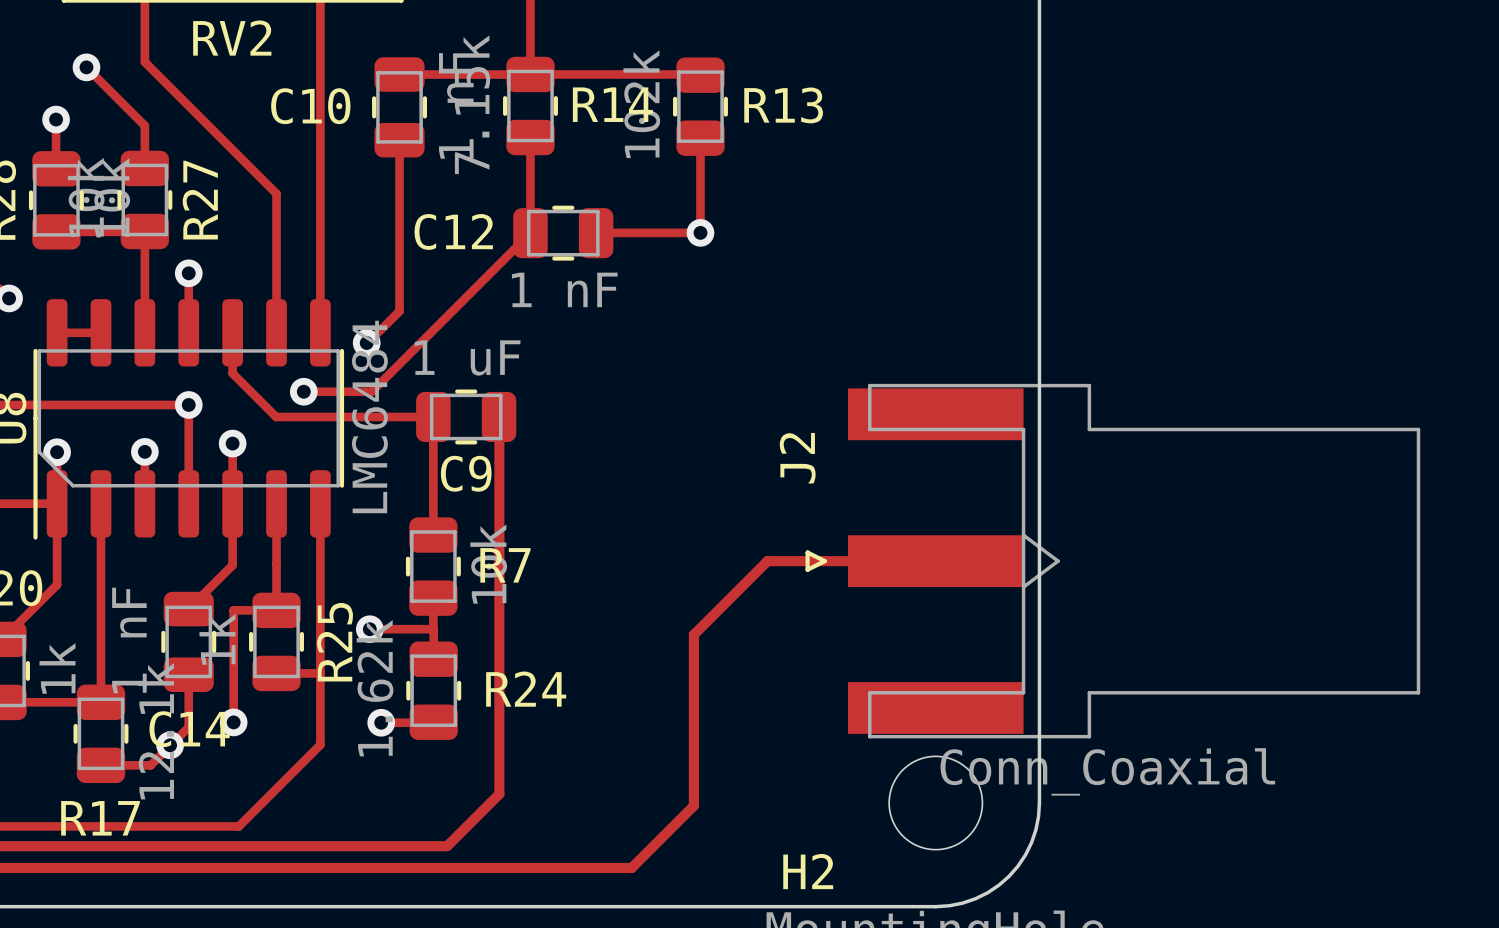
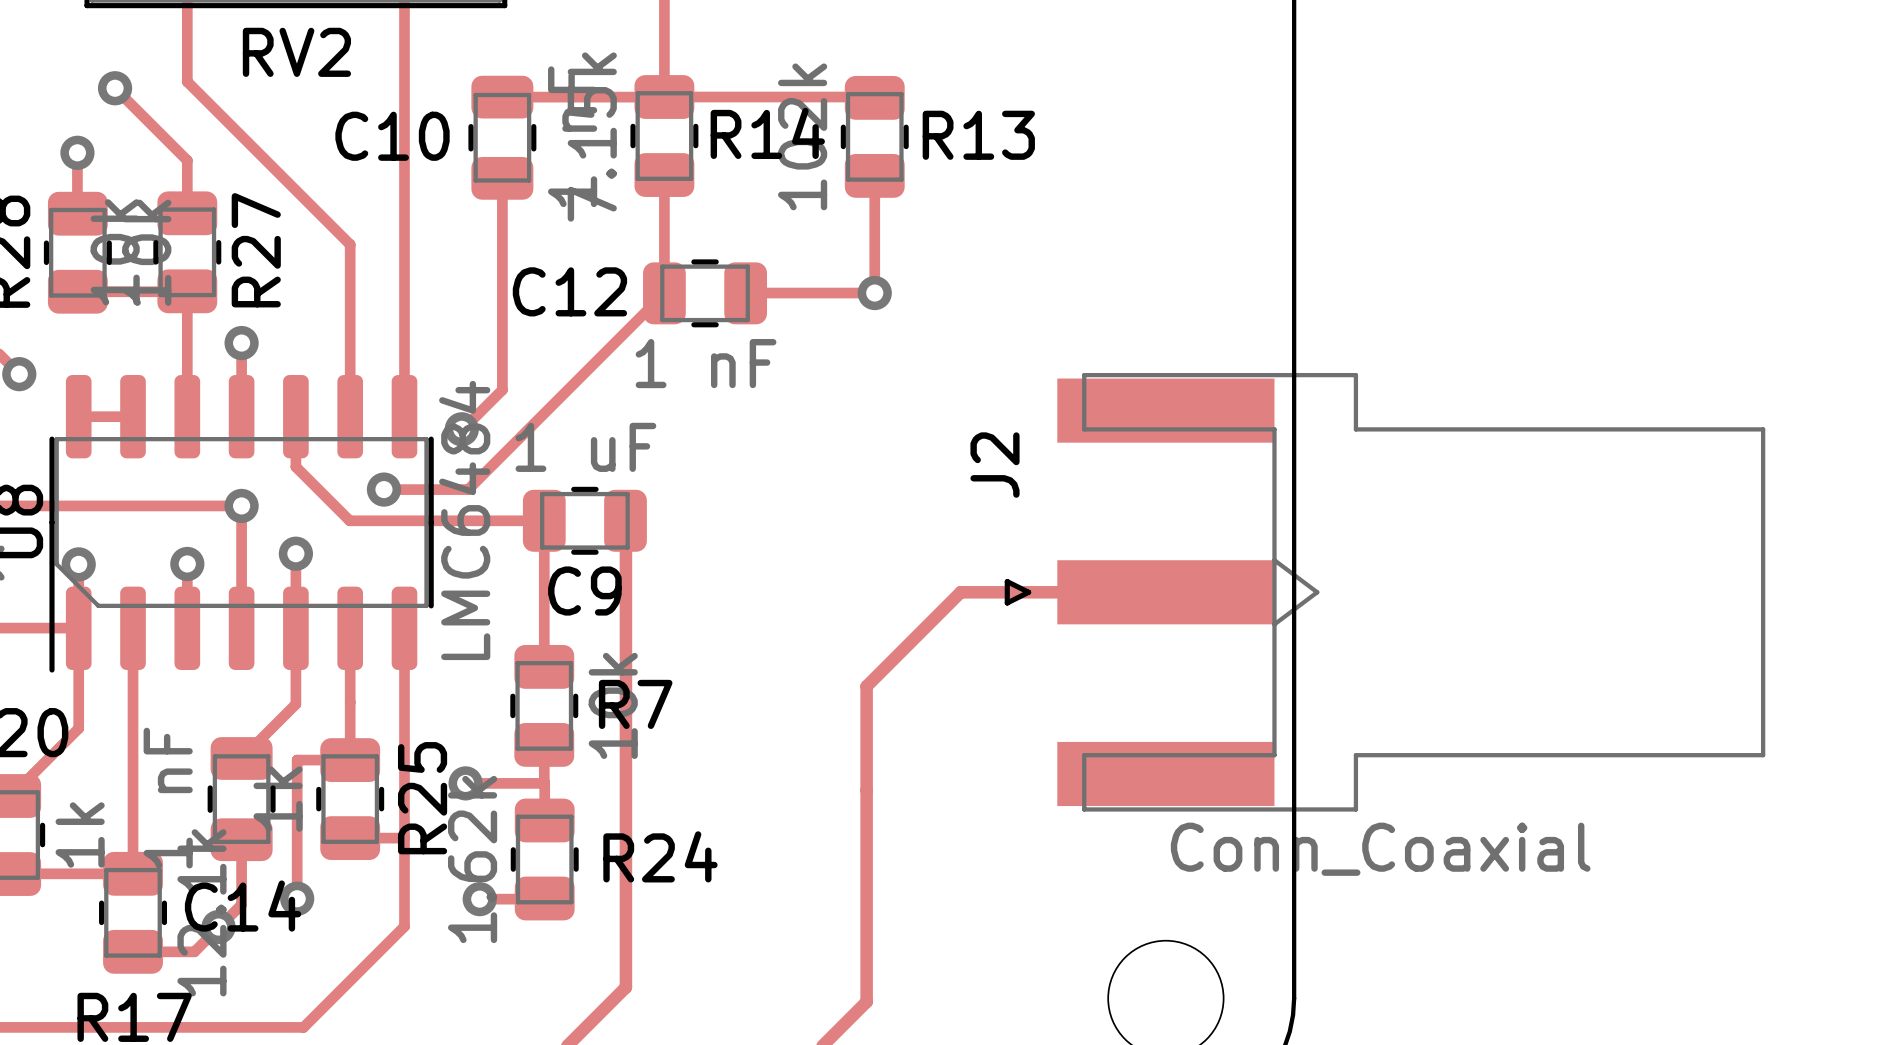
track: (935, 561) (767, 561) (693, 634) -> (1165, 592) (960, 592) (866, 686) (866, 790)
J2 position: (1112, 561) -> (1384, 592)

